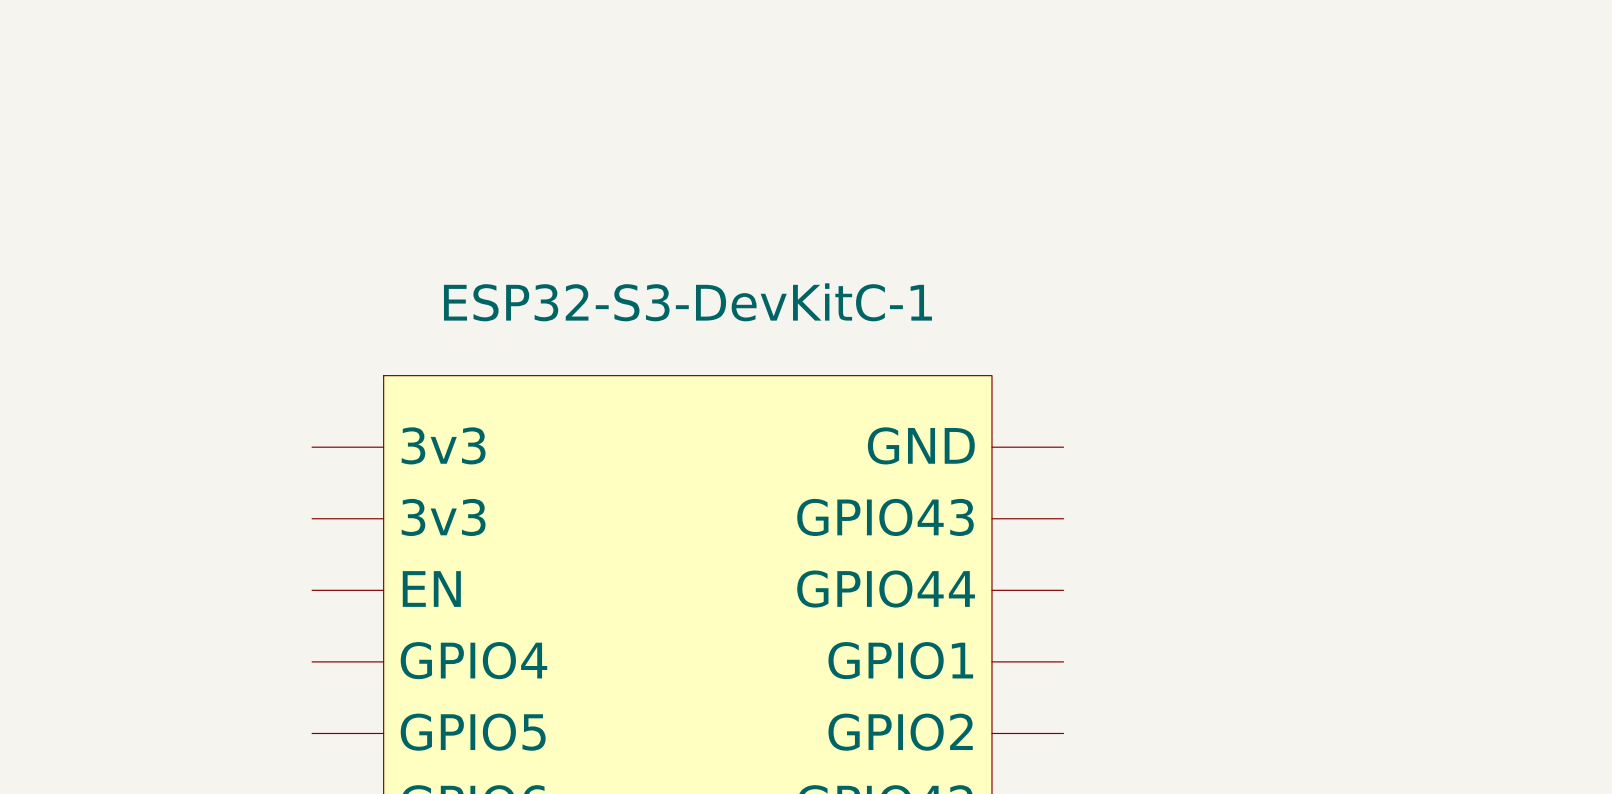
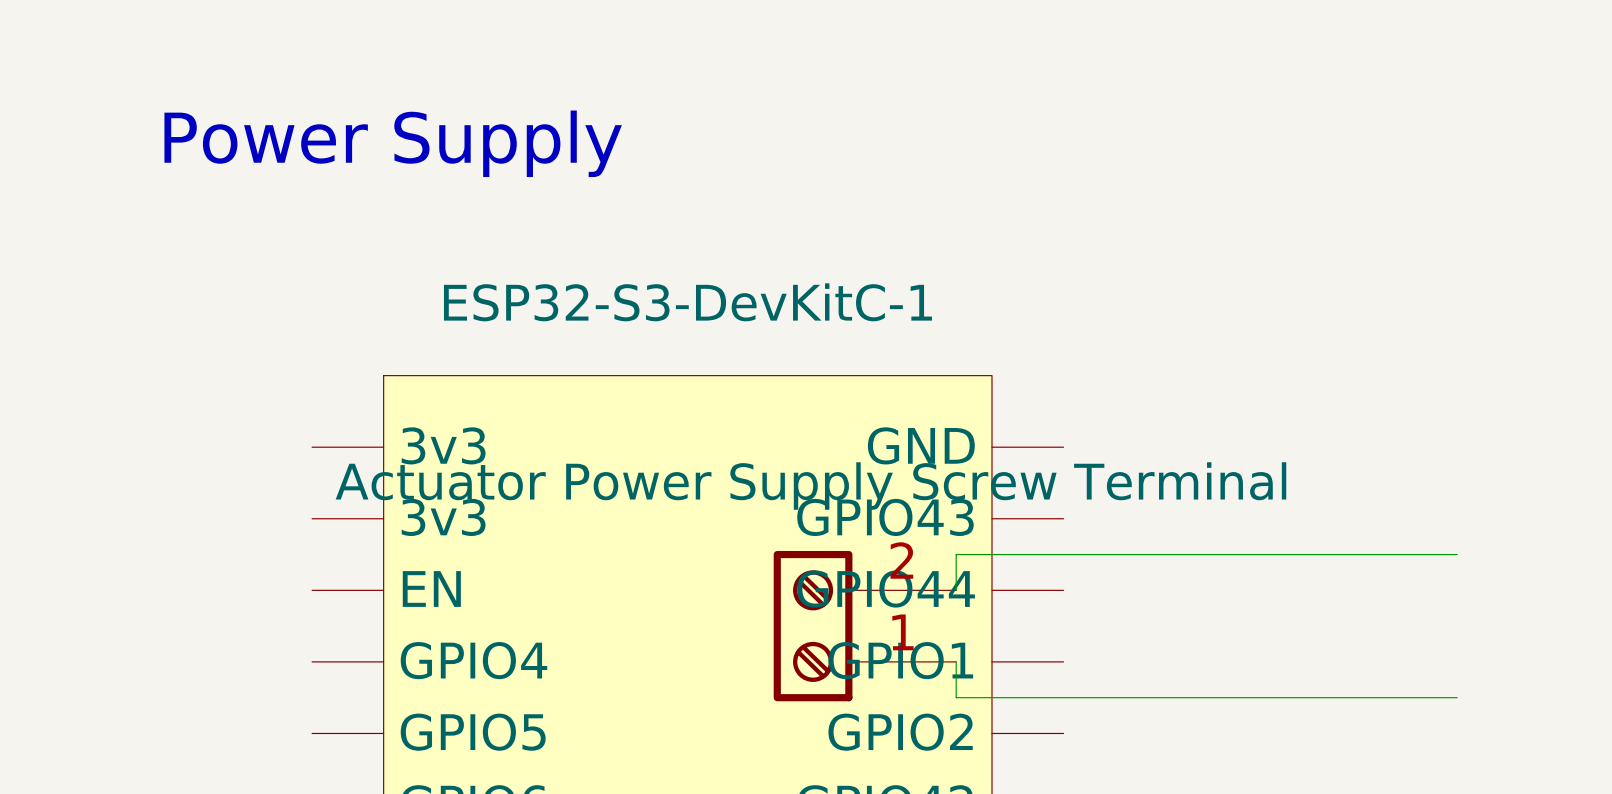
text: none -> Power Supply (393, 143)
wire: none -> (1457, 554) (956, 554) (956, 590)
part: none -> Actuator Power Supply Screw Terminal (864, 626)
wire: none -> (956, 661) (956, 697) (1457, 697)

